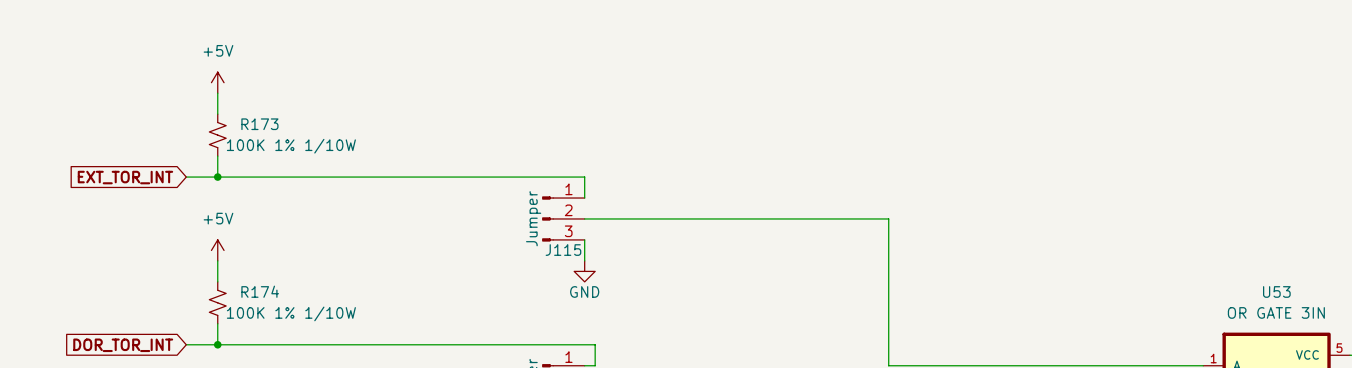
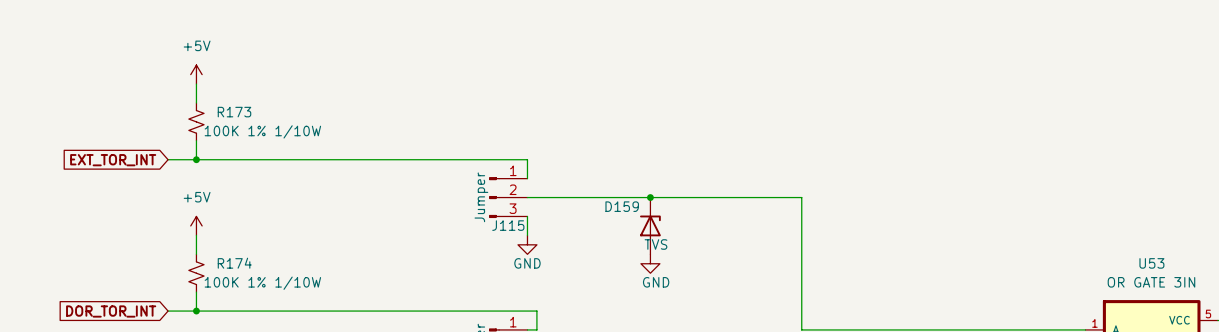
junction: none -> (650, 197)
D159: none -> TVS (650, 225)
power symbol: none -> GND (650, 263)

